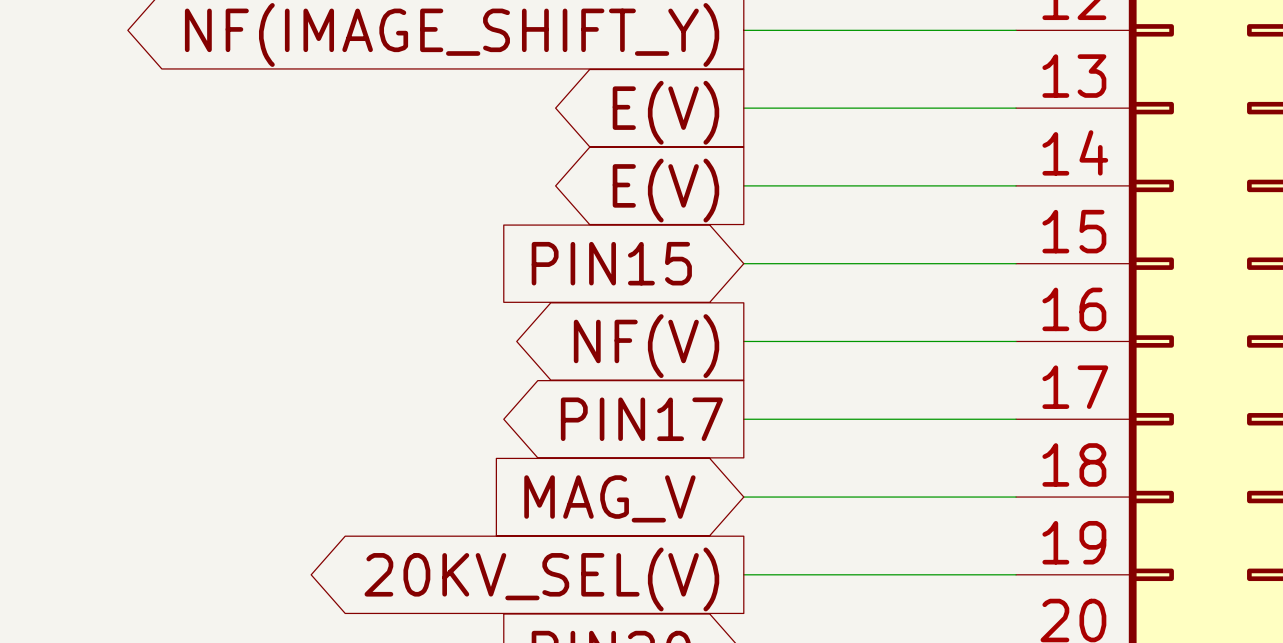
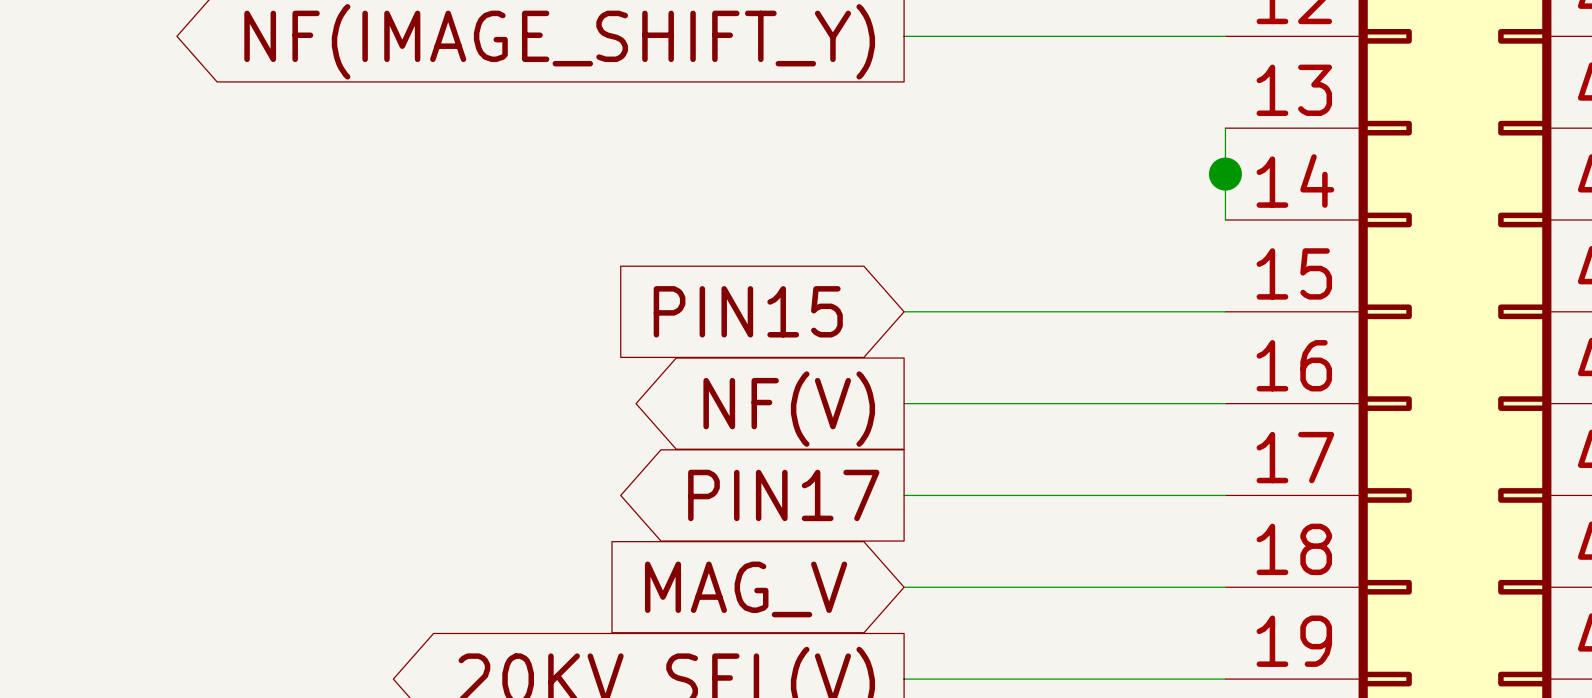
wire: (743, 108) (1016, 108) -> (1225, 219) (1225, 128)
global label: E(V) (665, 112) -> none
junction: none -> (1225, 174)
wire: (743, 185) (1016, 185) -> none
global label: E(V) (665, 190) -> none

